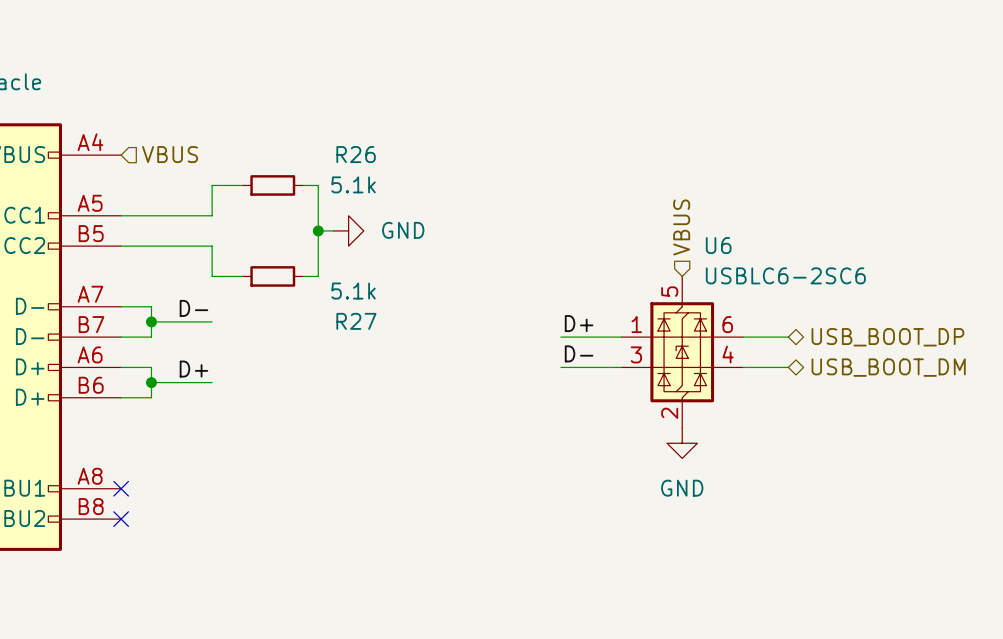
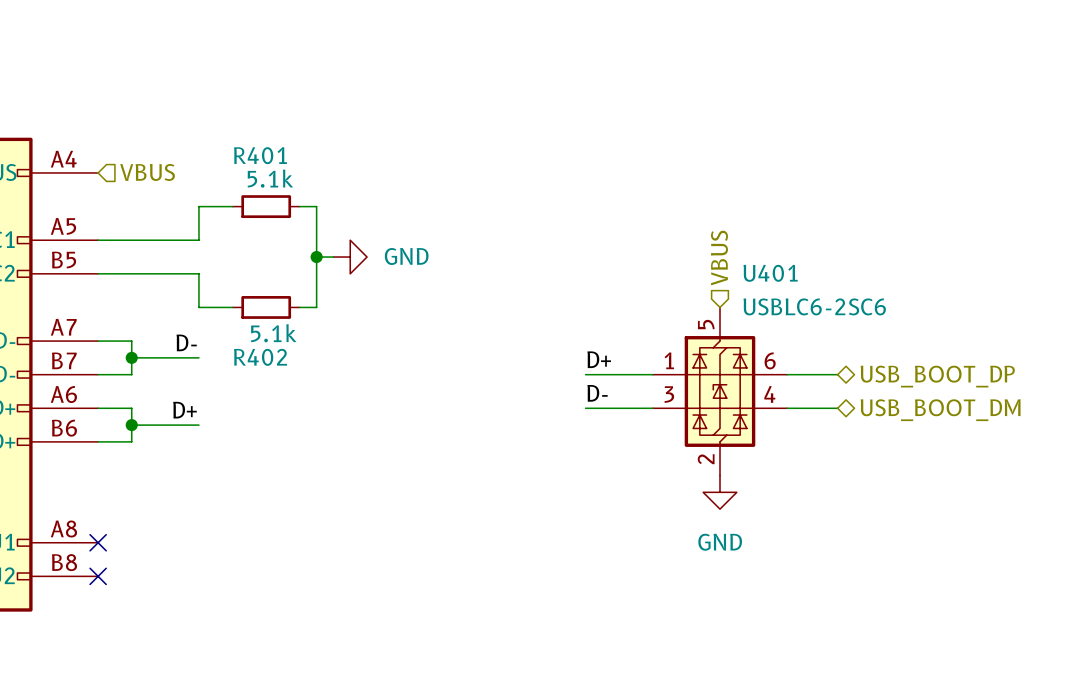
R26 name: R26 (356, 154) -> R401 (260, 155)
R26 value position: 5.1k (353, 184) -> 5.1k (270, 178)
U6 name: U6 (718, 245) -> U401 (770, 273)
R27 value position: 5.1k (353, 291) -> 5.1k (273, 333)
R27 name: R27 (356, 321) -> R402 (260, 357)

